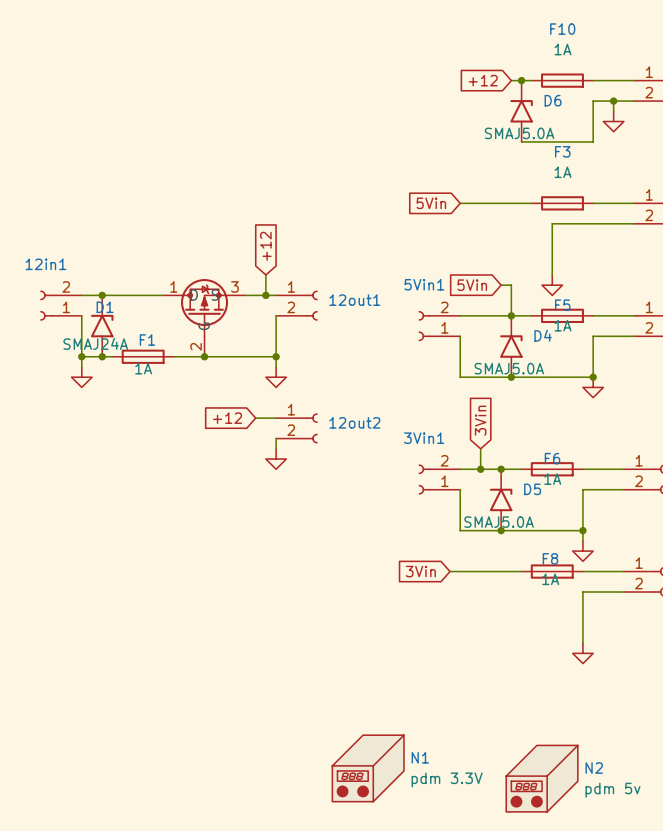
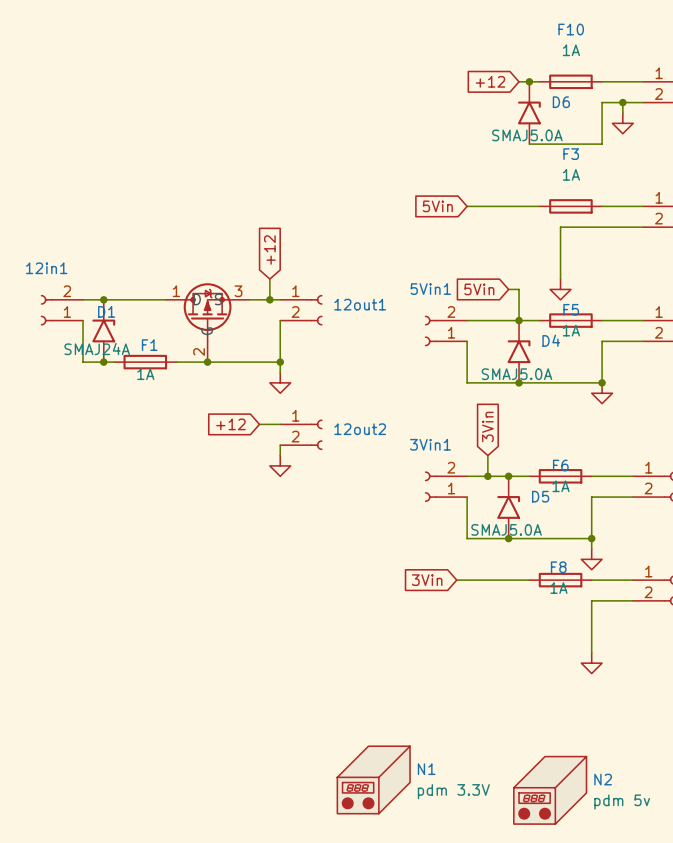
wire: (81, 356) (81, 366) -> none
junction: (81, 356) -> none
power symbol: (81, 377) -> none

